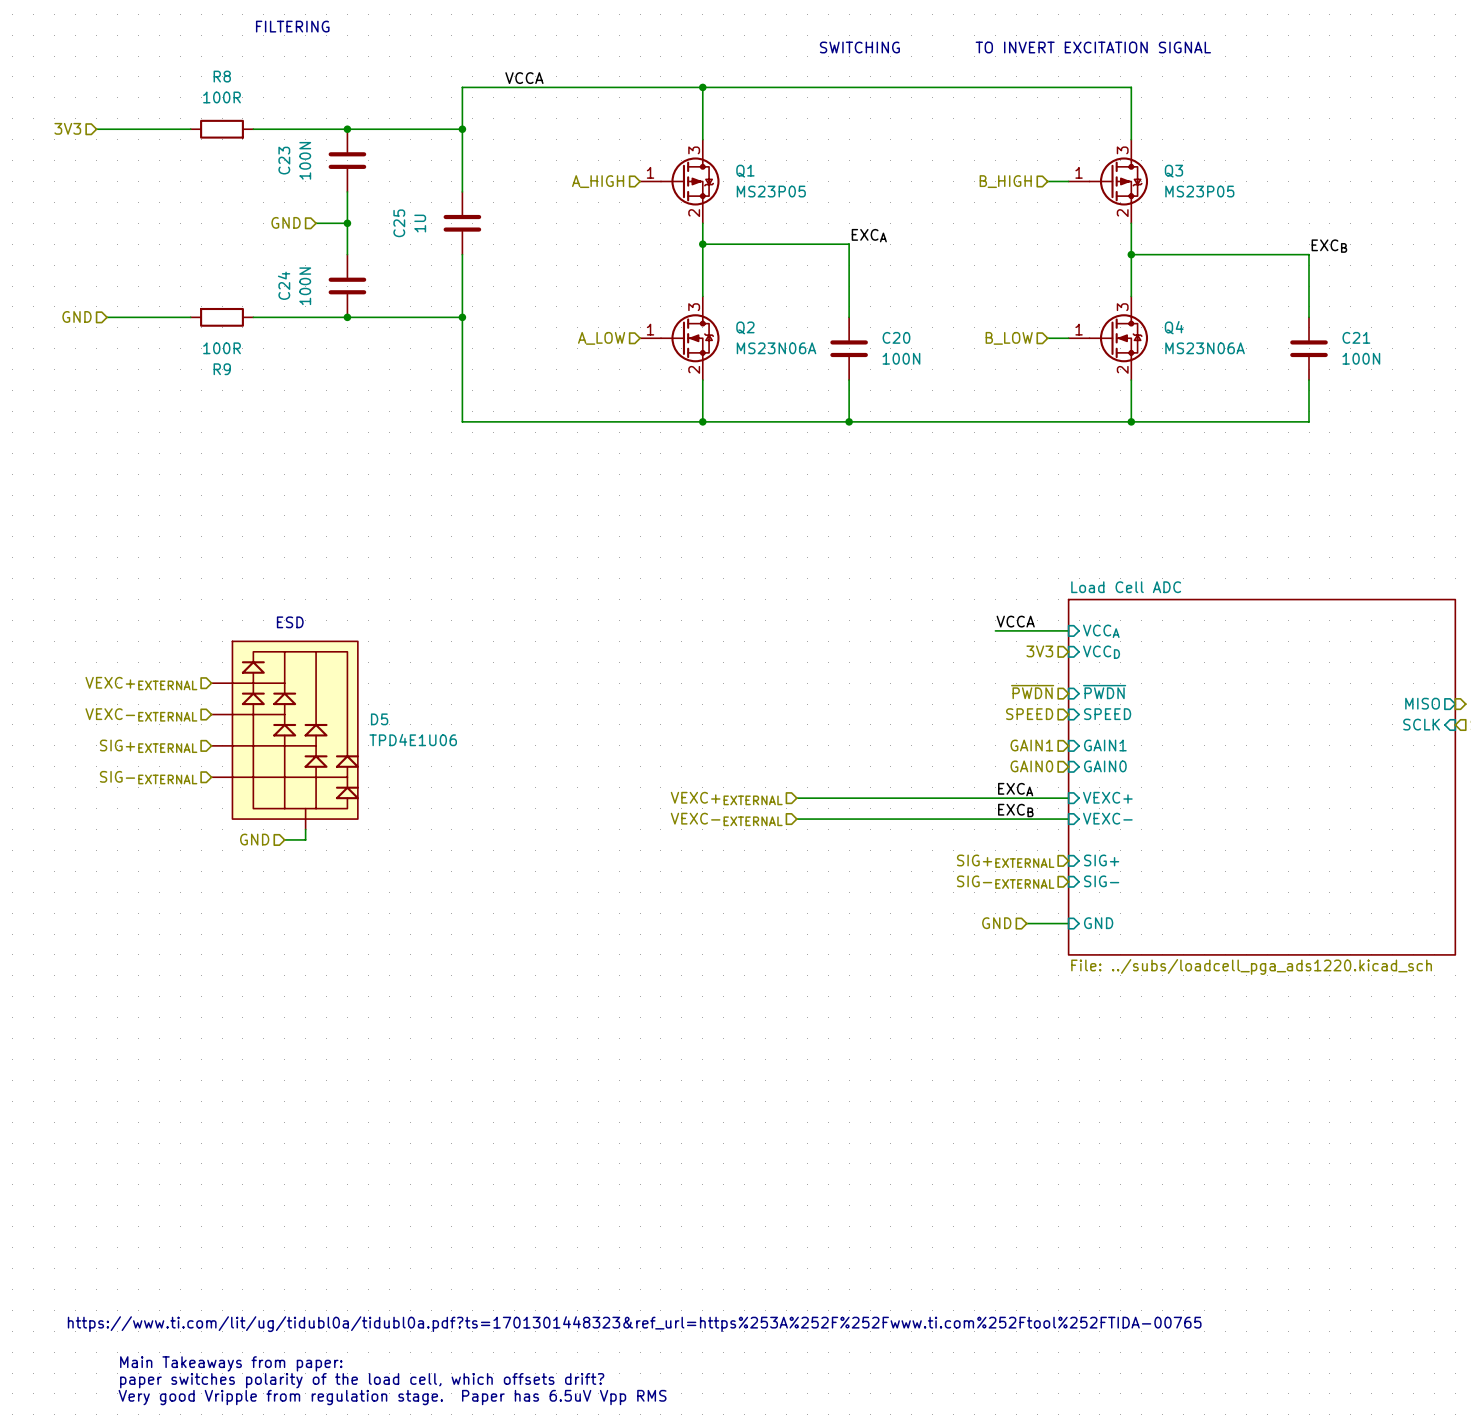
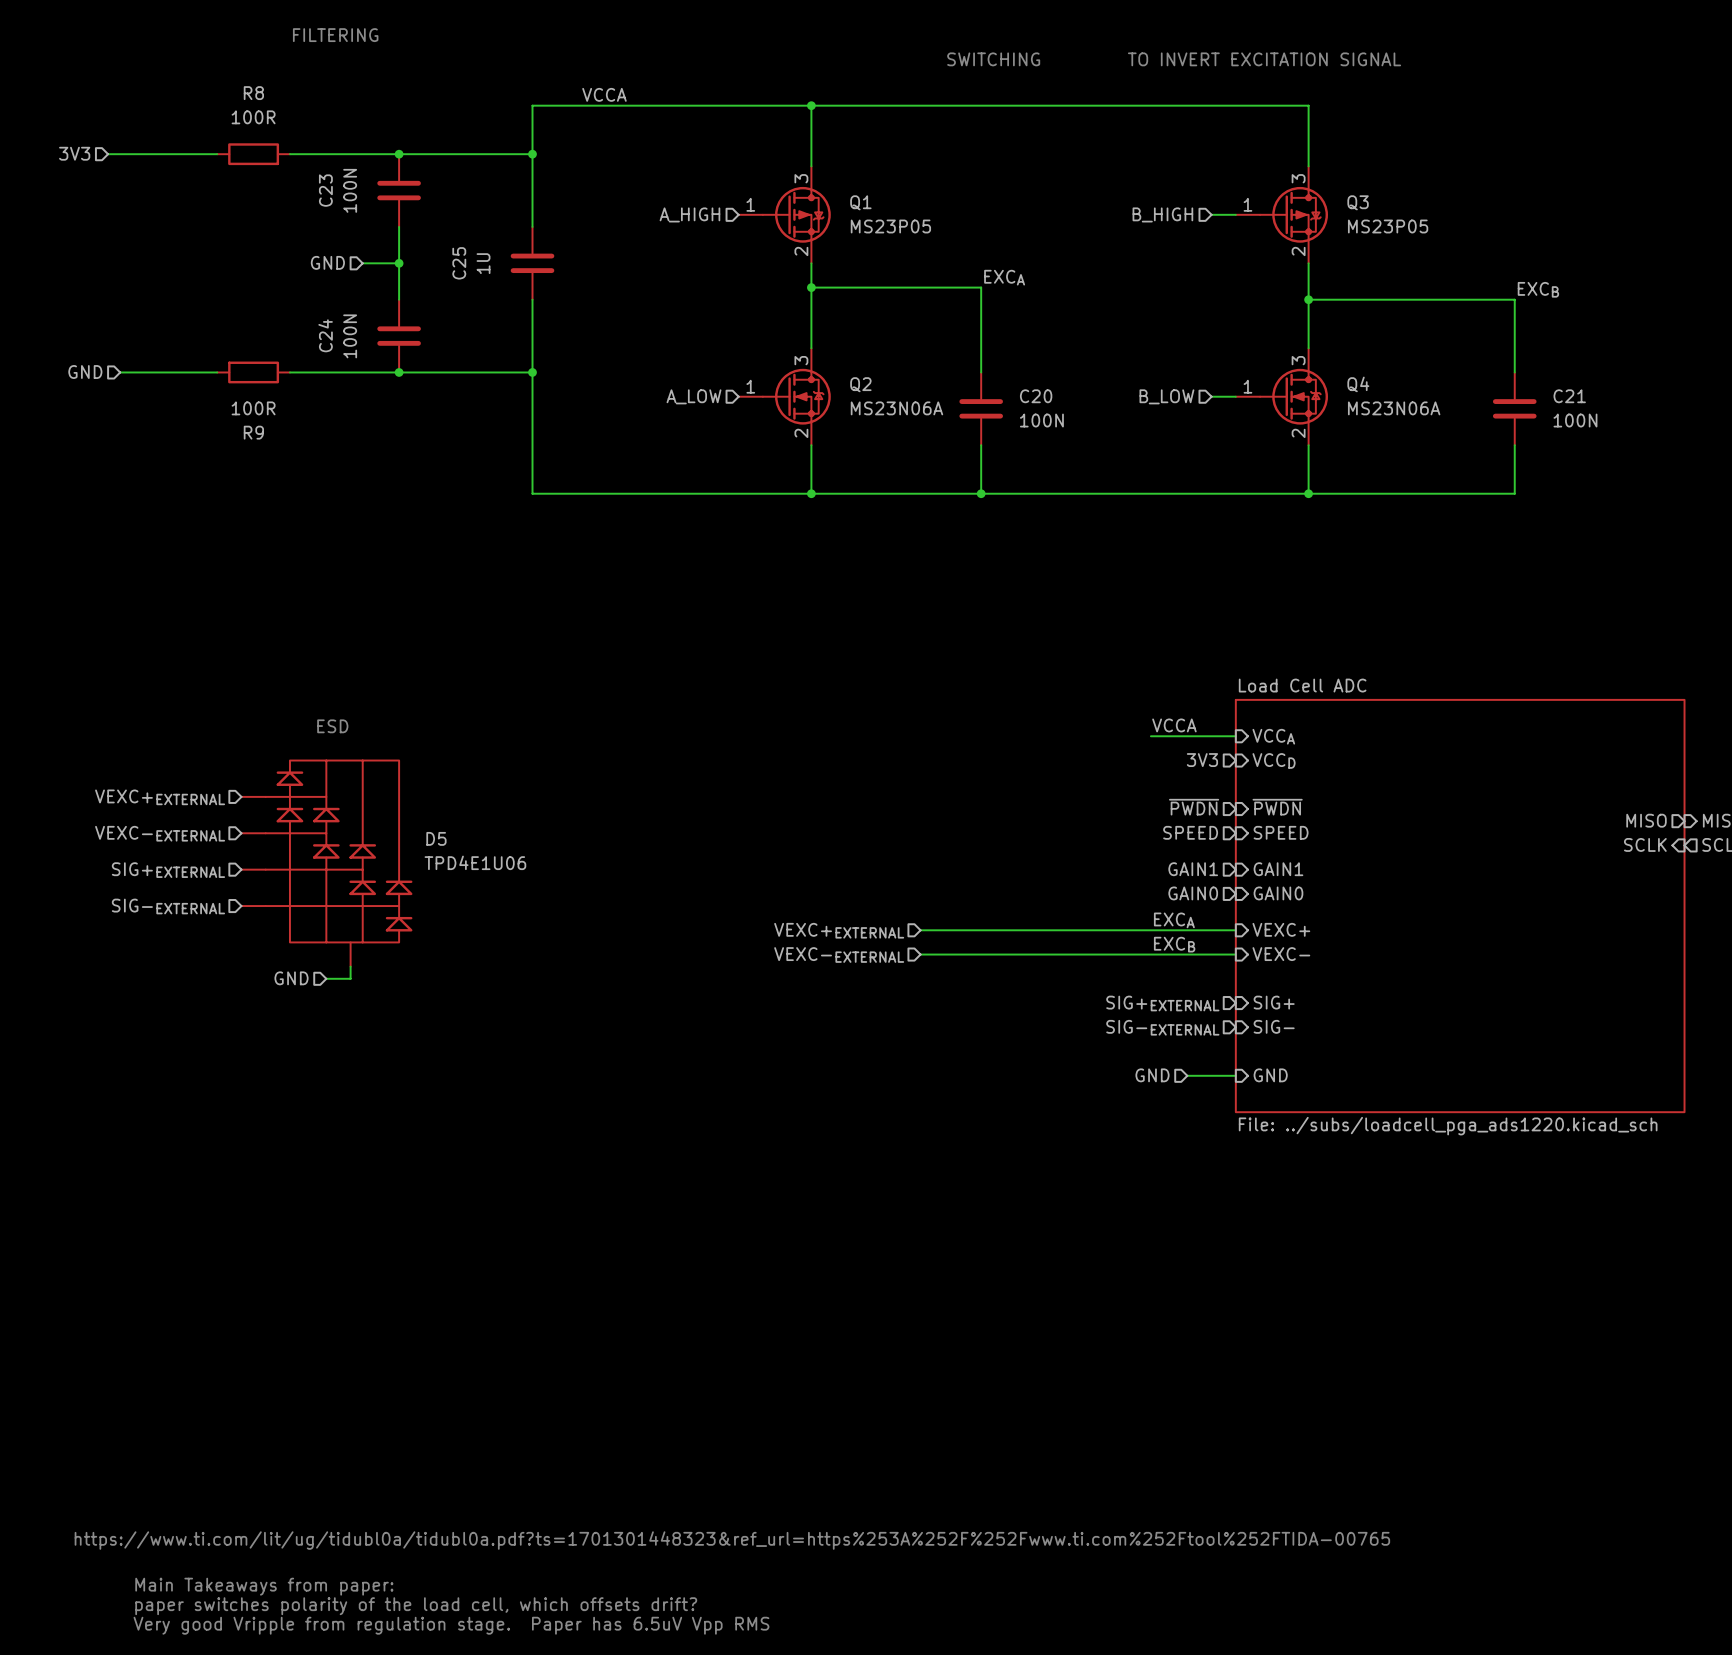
D5 symbol: [211, 641, 359, 830] -> [241, 760, 413, 967]

